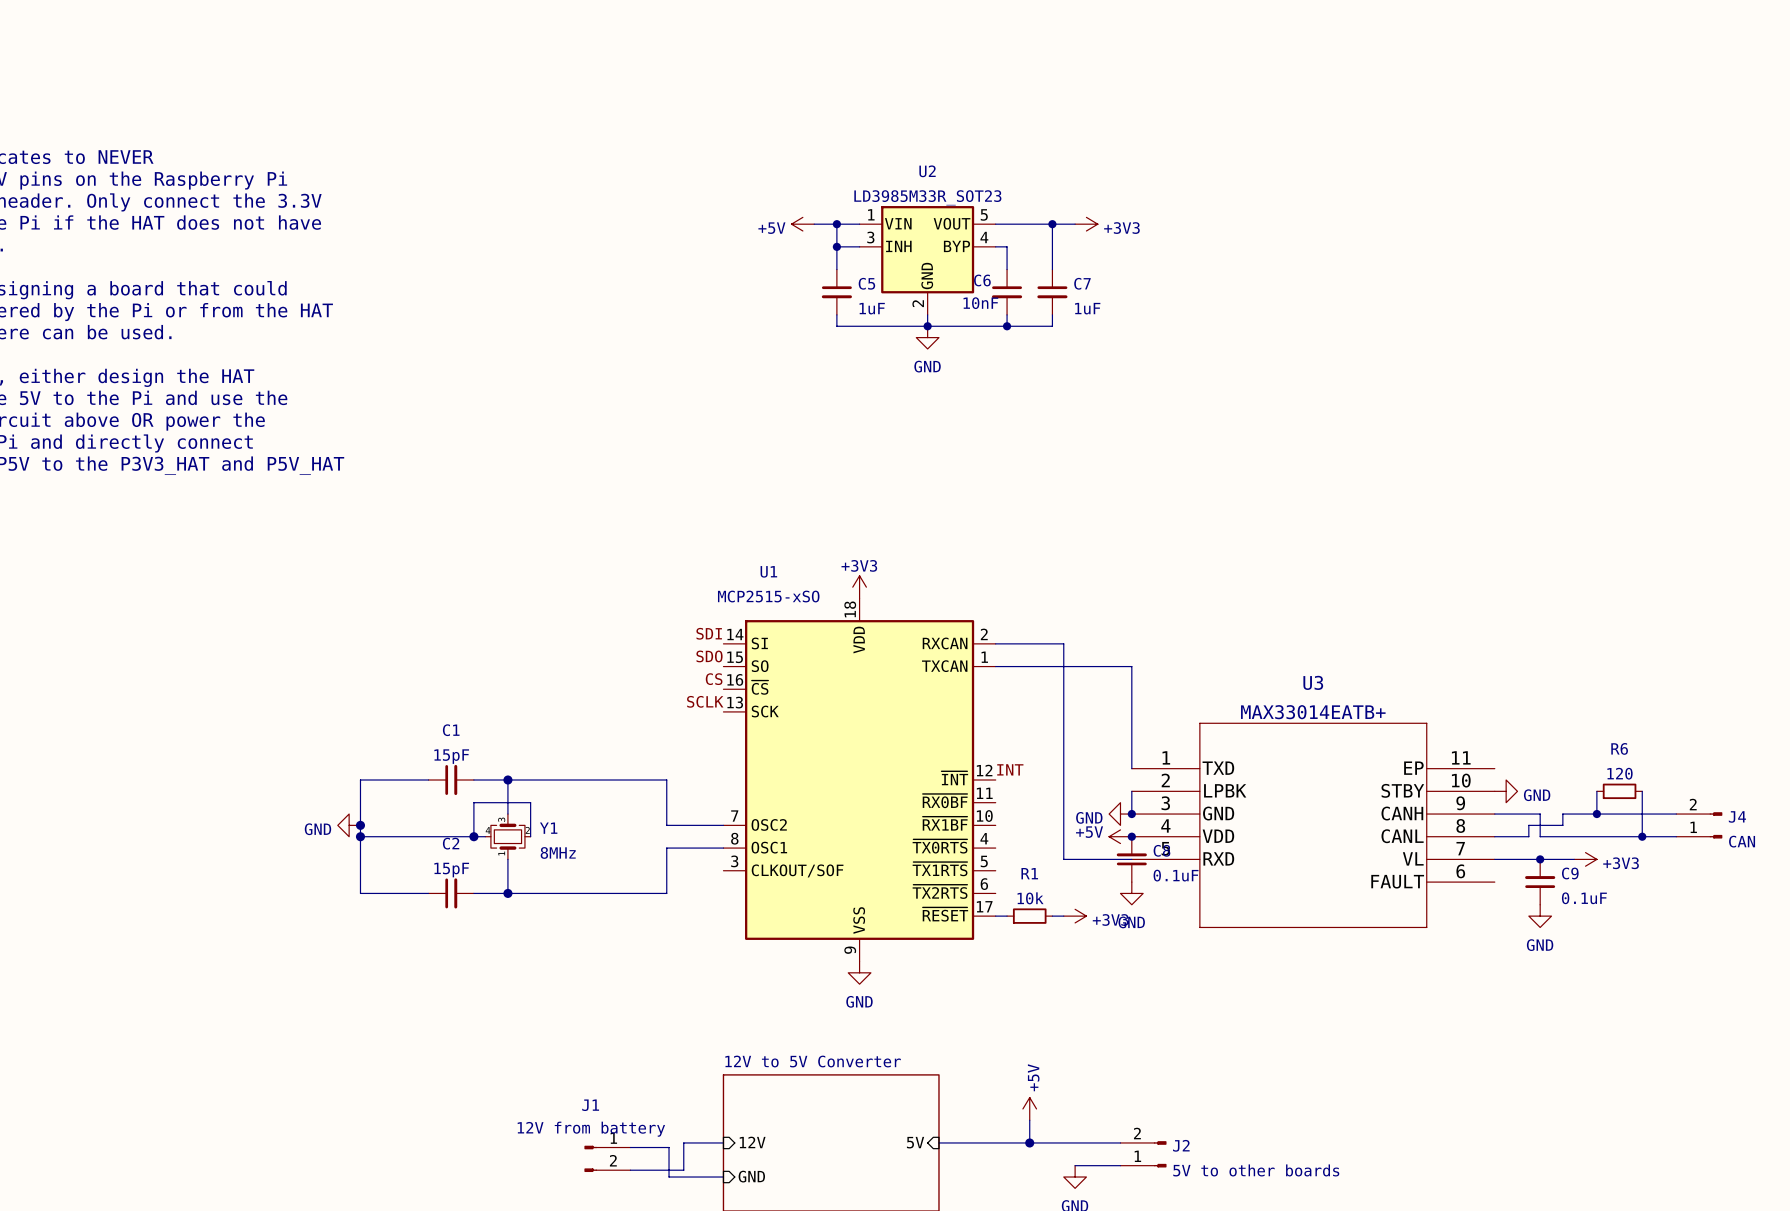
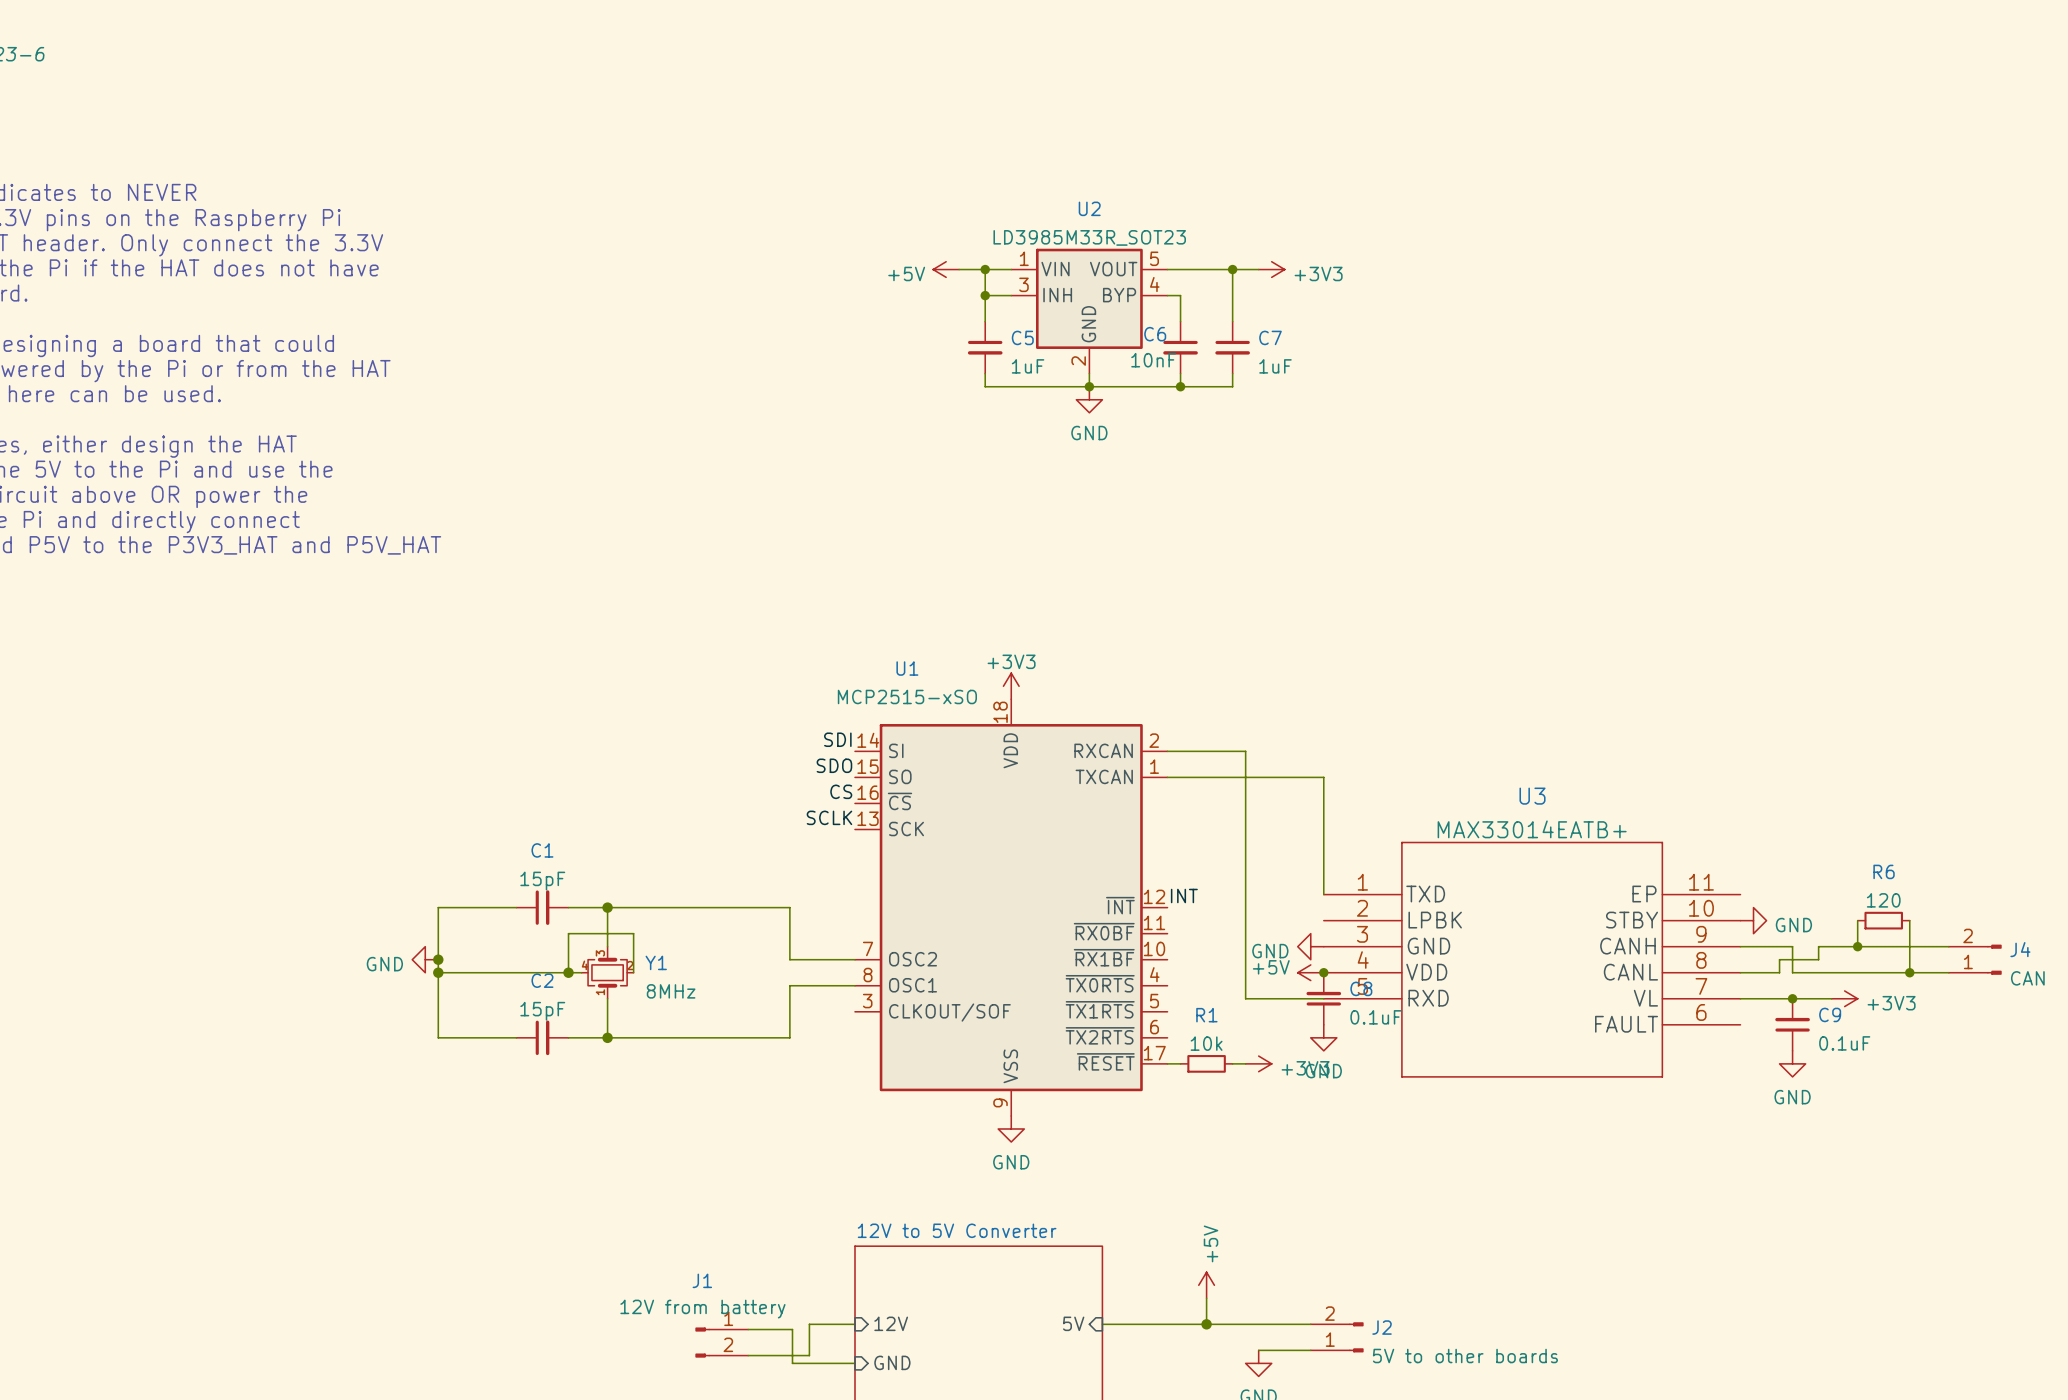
wire: (1131, 791) (1131, 814) -> none
junction: (1131, 814) -> none

